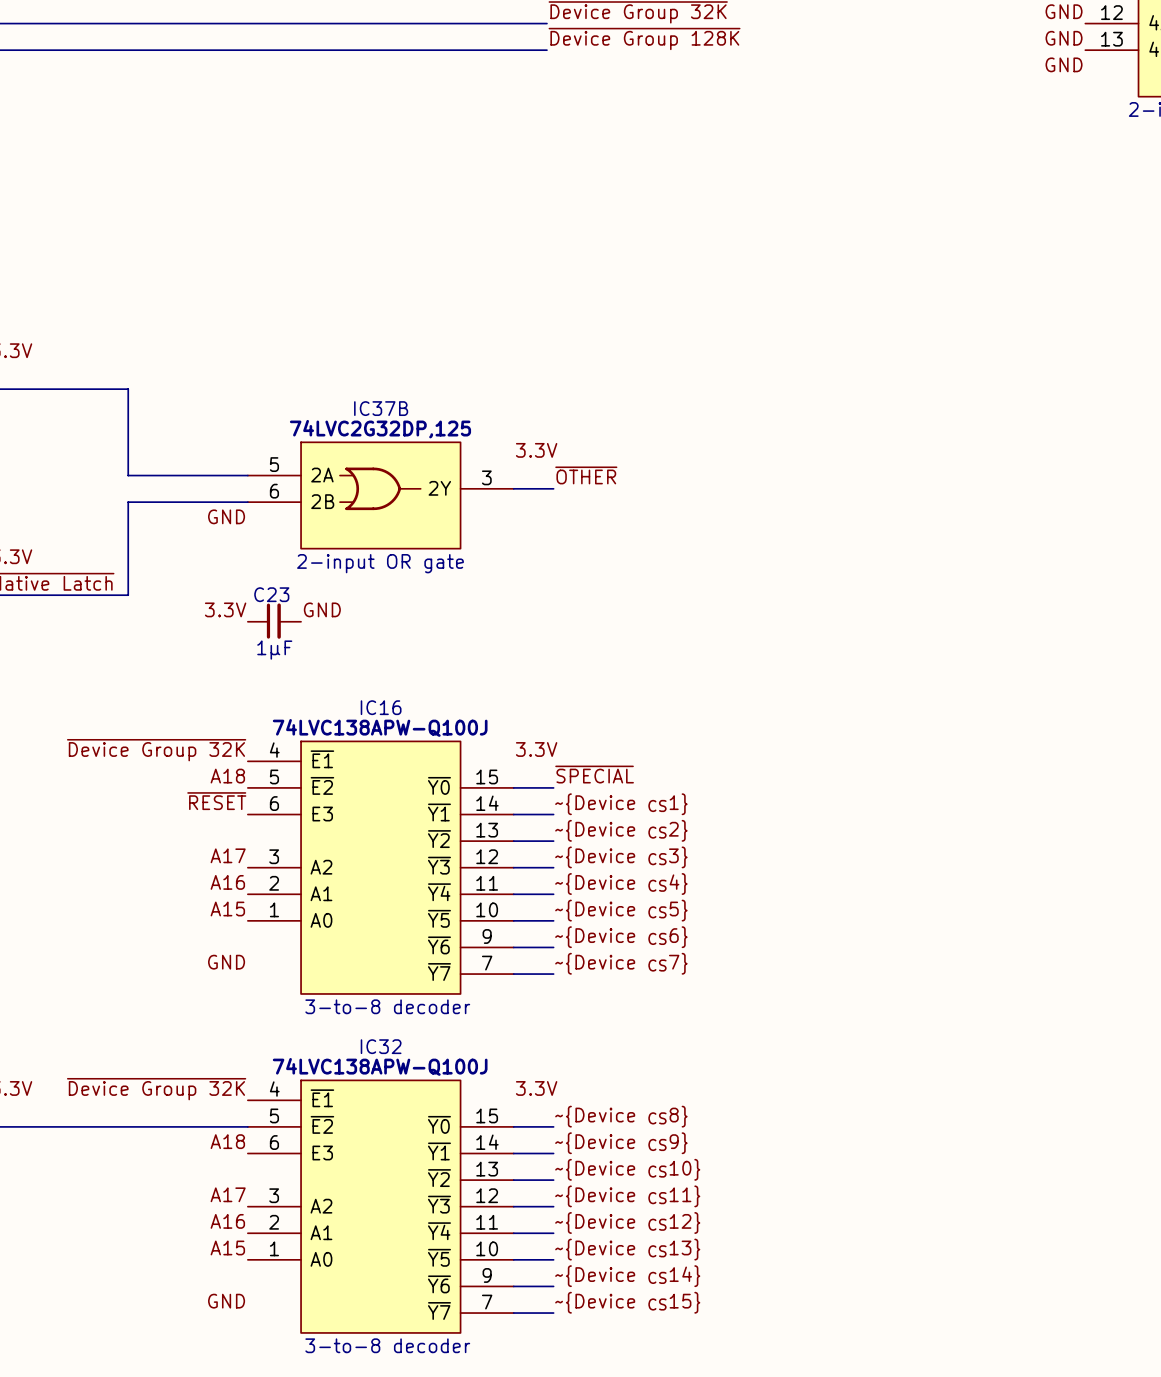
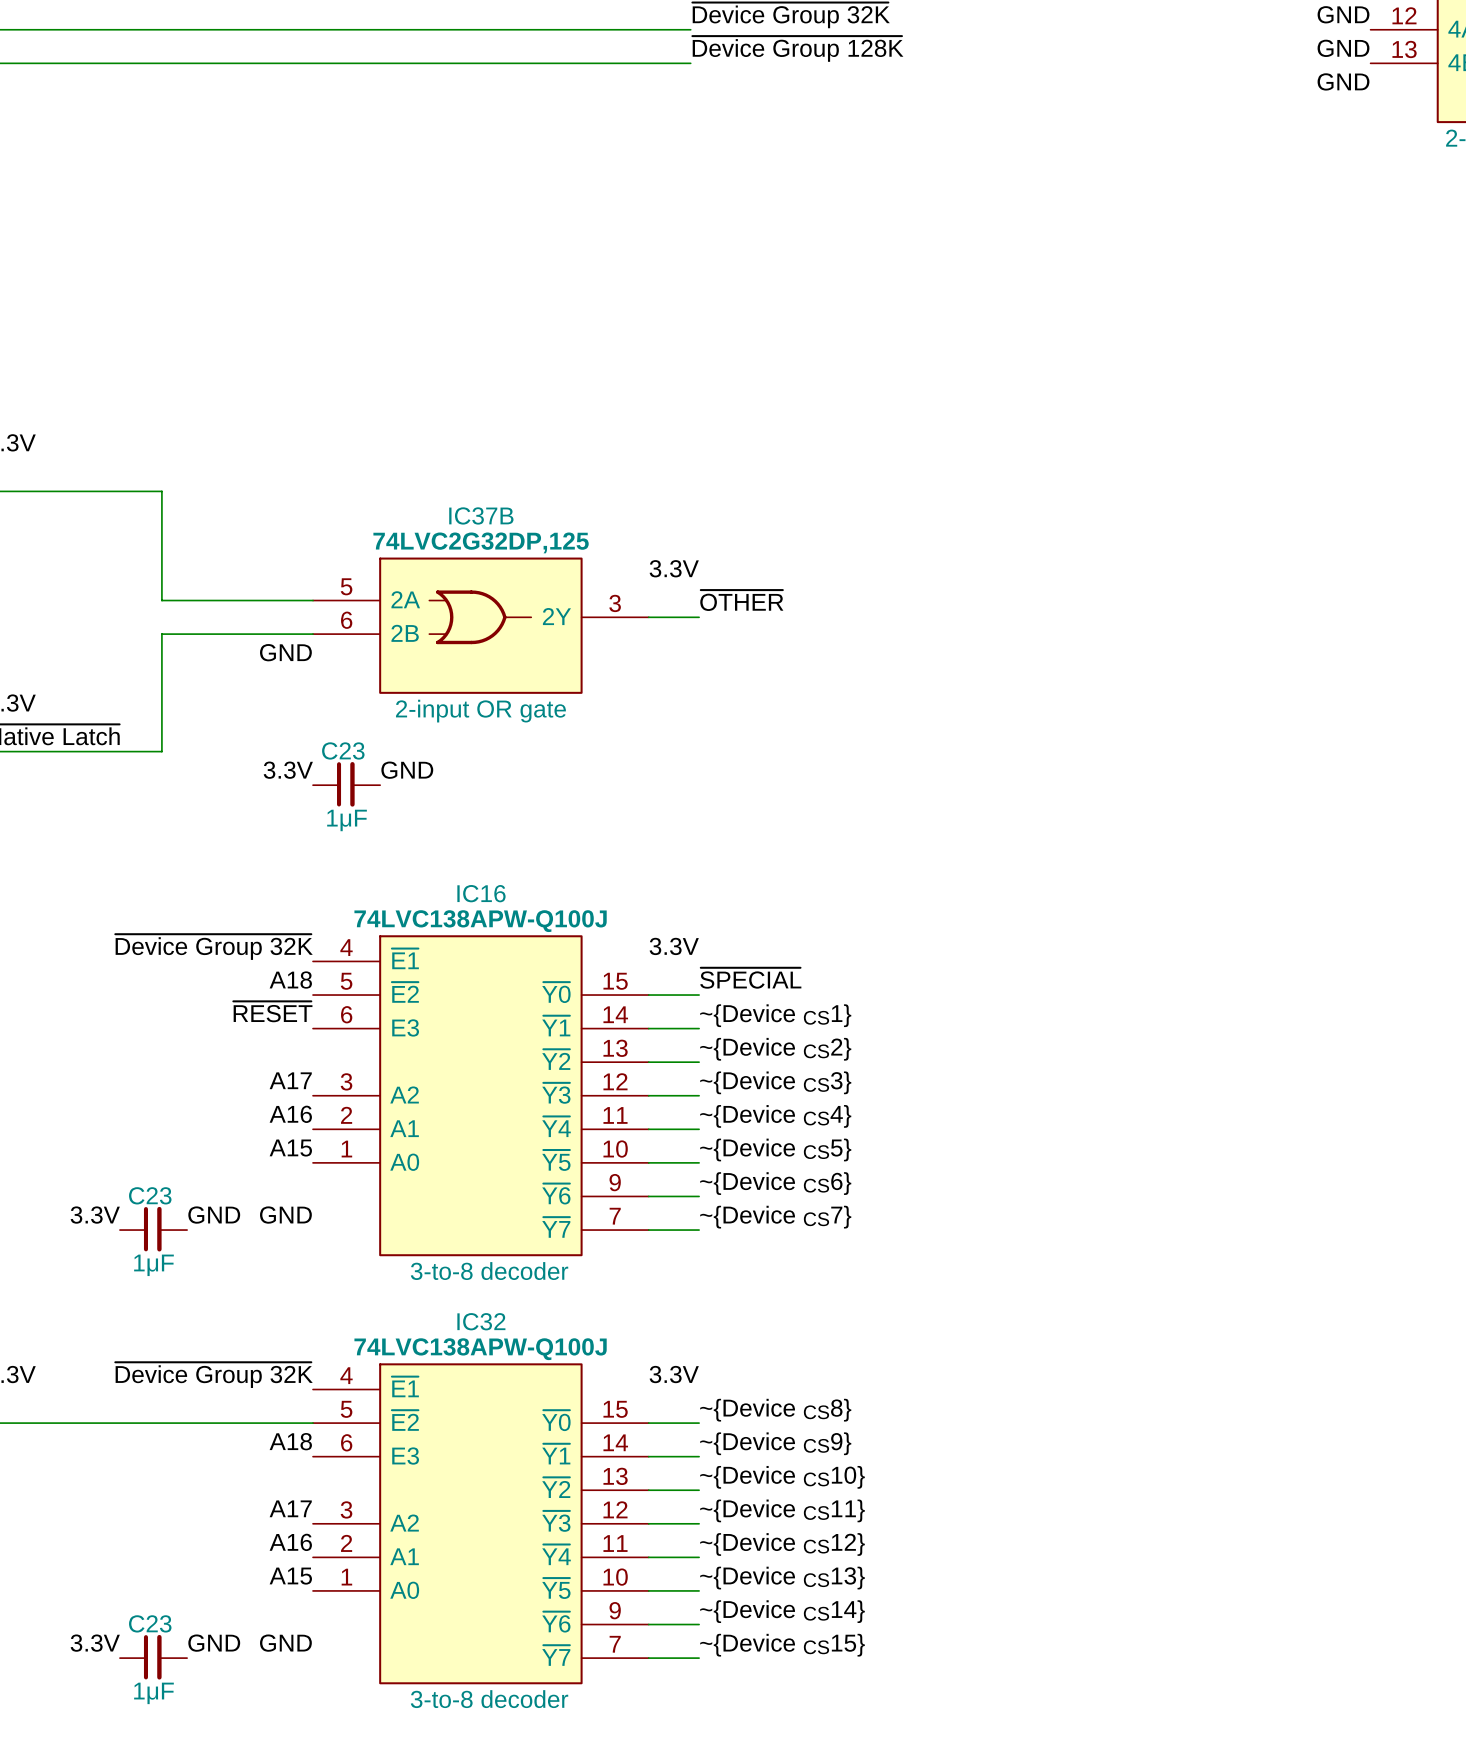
label: none -> 3.3V (95, 1215)
label: none -> GND (214, 1215)
C23: none -> 1μF (153, 1229)
label: none -> 3.3V (95, 1643)
label: none -> GND (214, 1643)
C23: none -> 1μF (153, 1657)

